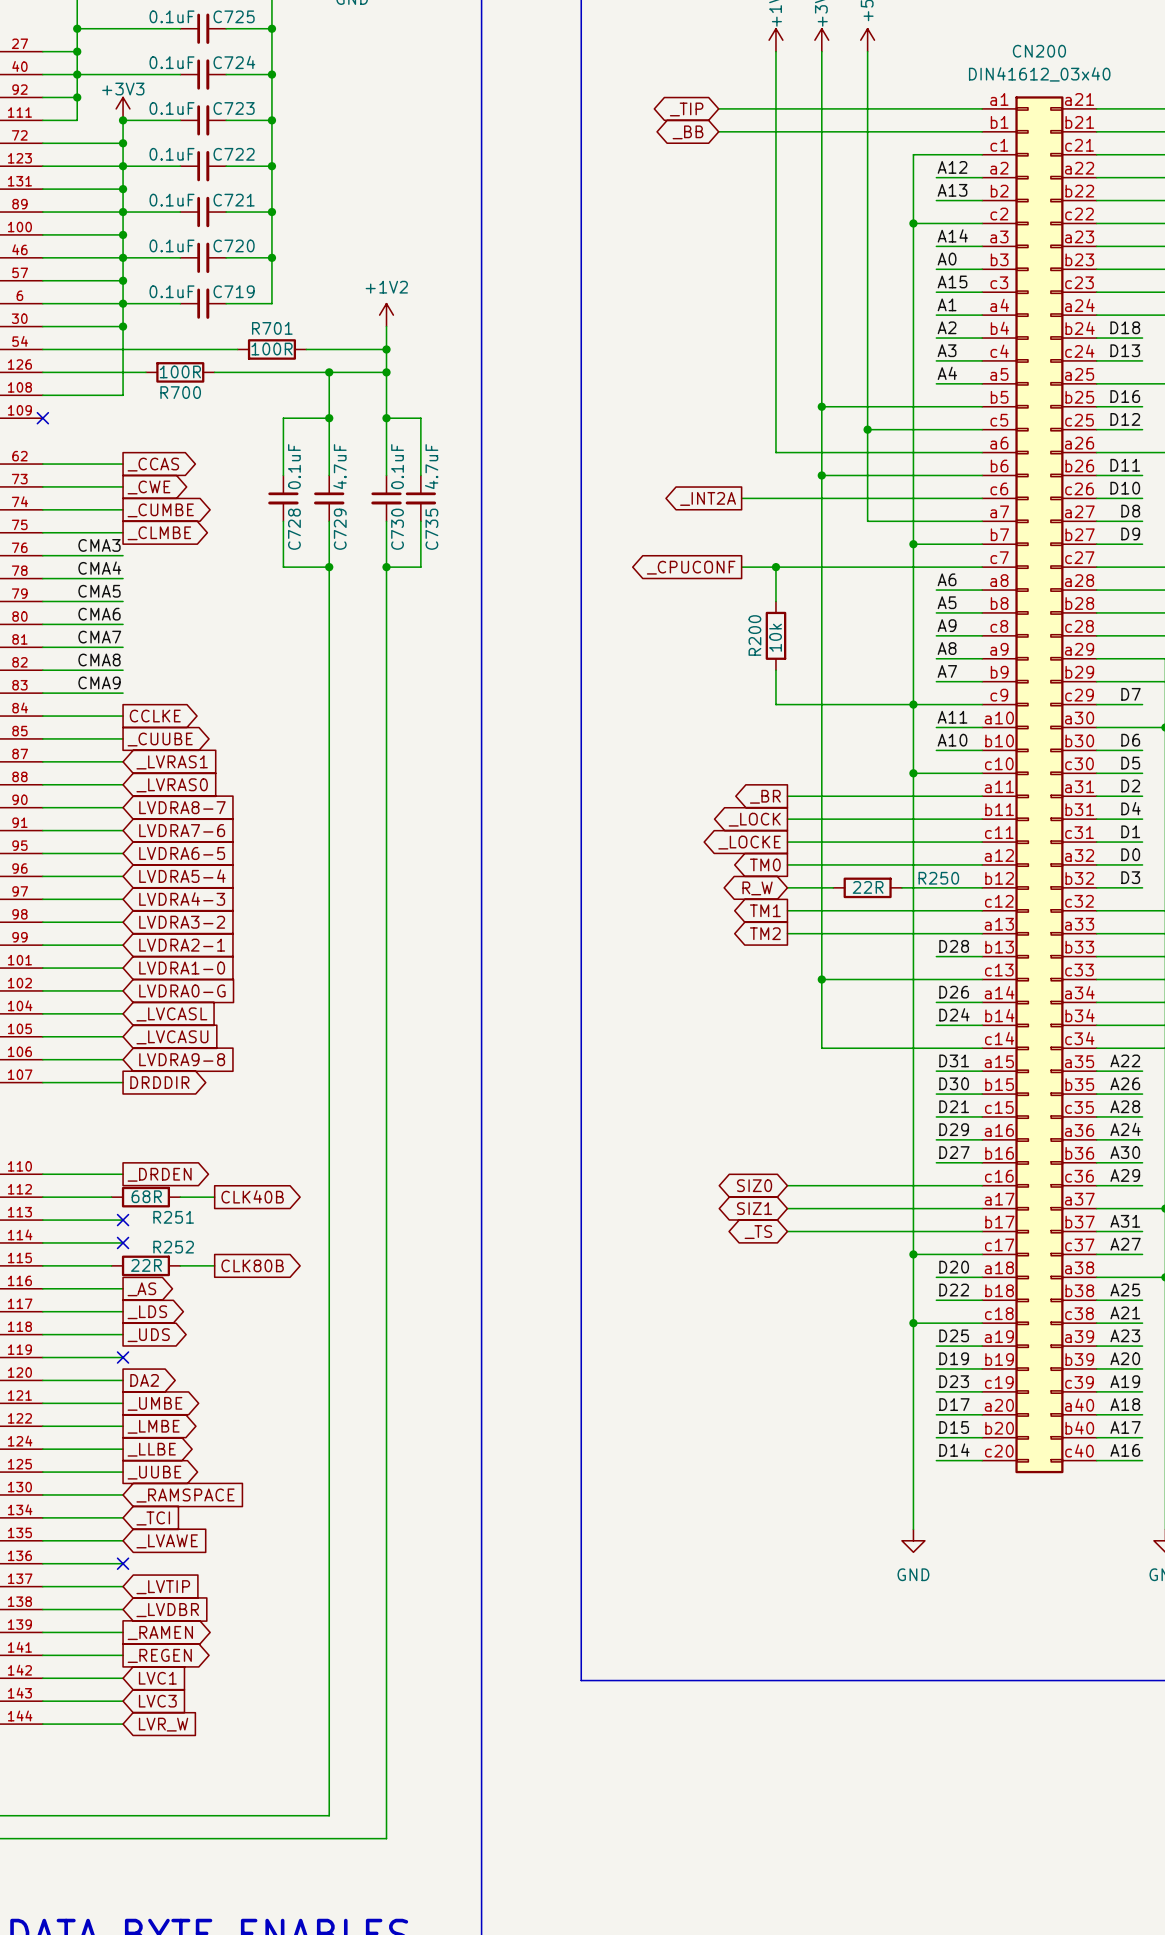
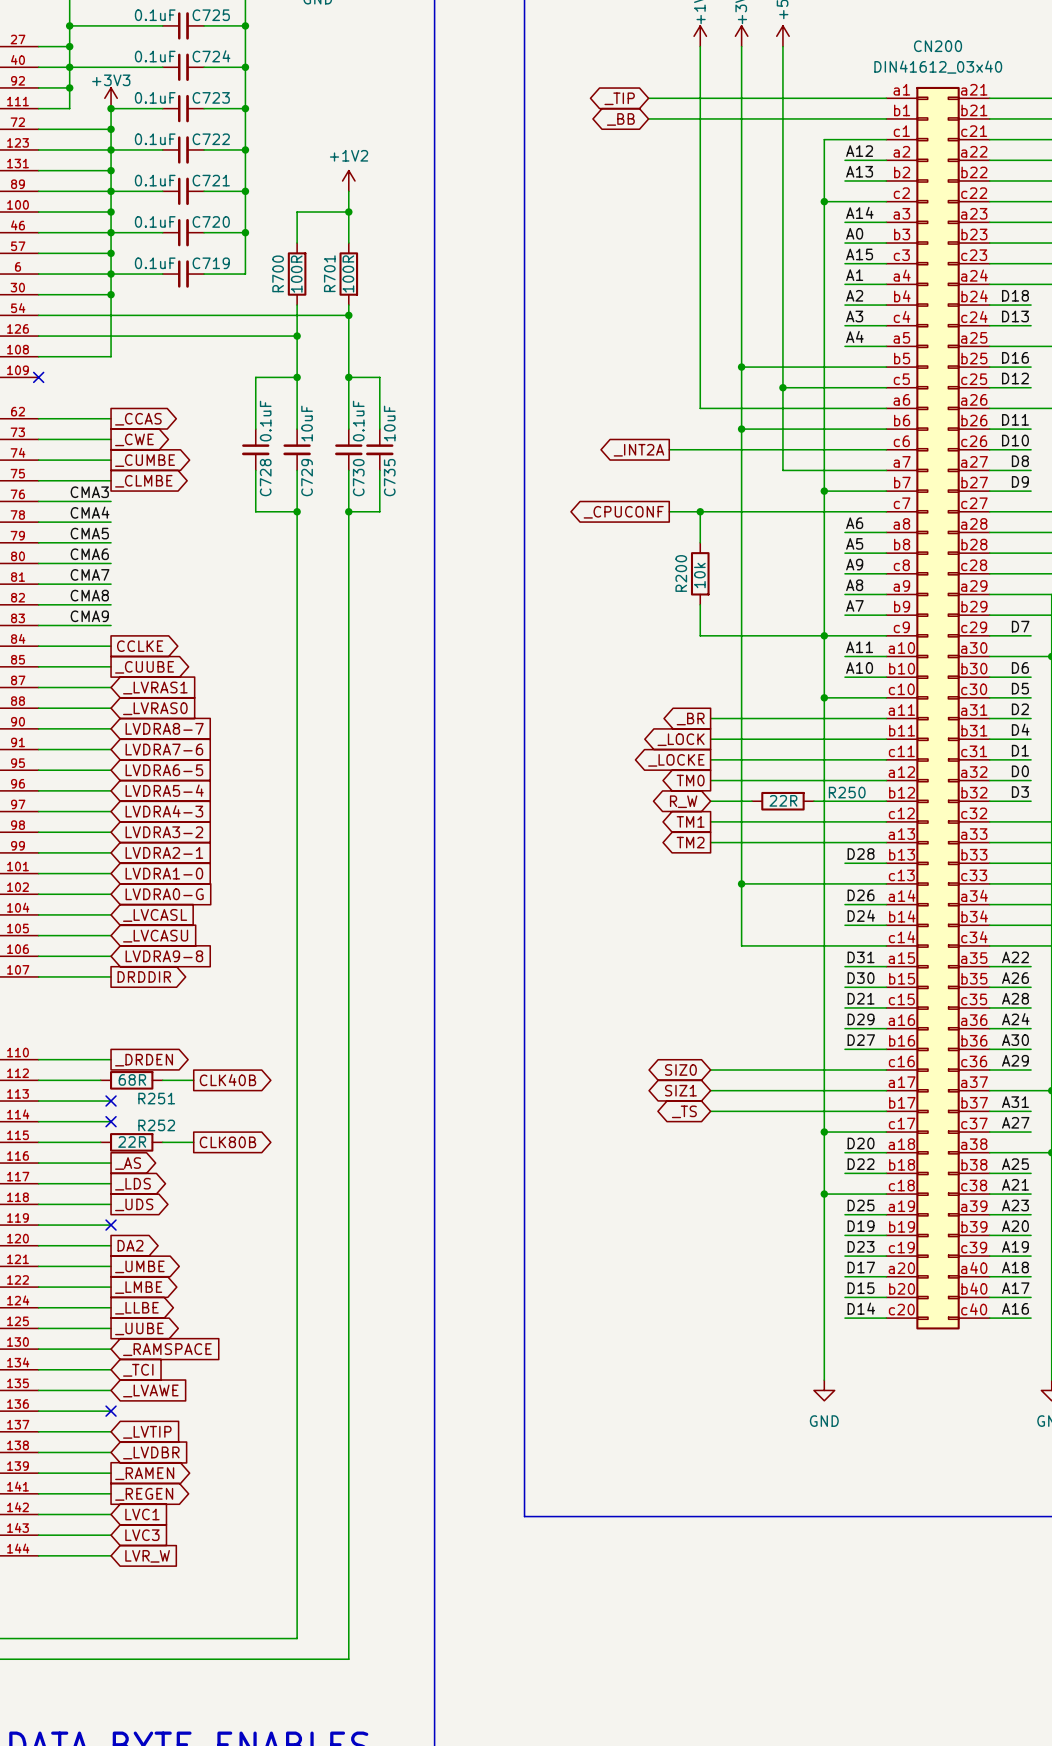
wire: none -> (348, 191) (348, 243)
wire: none -> (348, 212) (297, 212) (297, 243)
junction: none -> (348, 212)
power symbol position: +1V2 (386, 315) -> +1V2 (348, 180)
R701 name position: R701 (272, 328) -> R701 (329, 273)
R701 rotation: 0° (271, 349) -> 90° clockwise (348, 274)
R701 position: (271, 349) -> (348, 274)
R700 rotation: 0° (180, 372) -> 90° clockwise (297, 274)
R700 position: (180, 372) -> (297, 274)
wire: (329, 372) (386, 372) -> (297, 336) (297, 305)
junction: (386, 372) -> none
C729 value: 4.7uF (339, 466) -> 10uF (307, 423)
C735 value: 4.7uF (431, 466) -> 10uF (389, 423)

